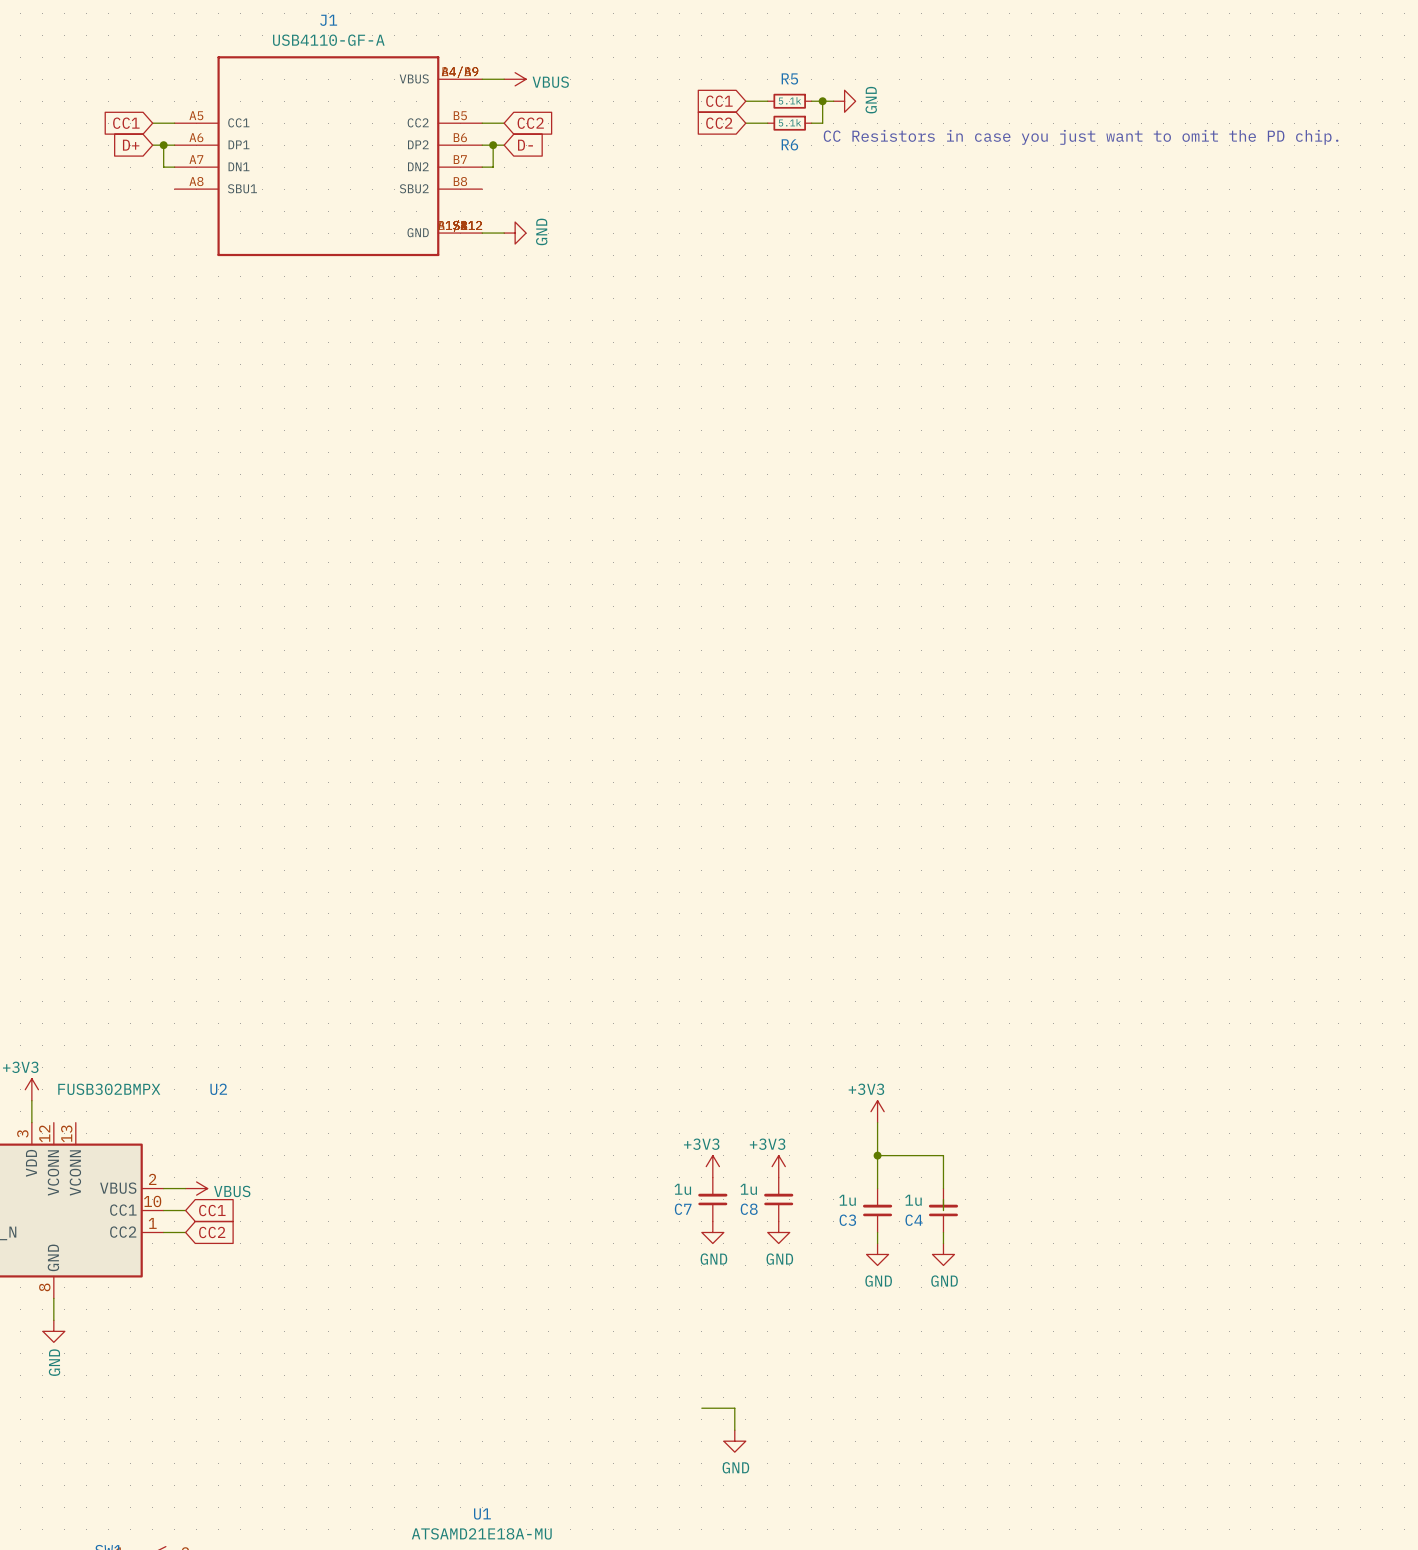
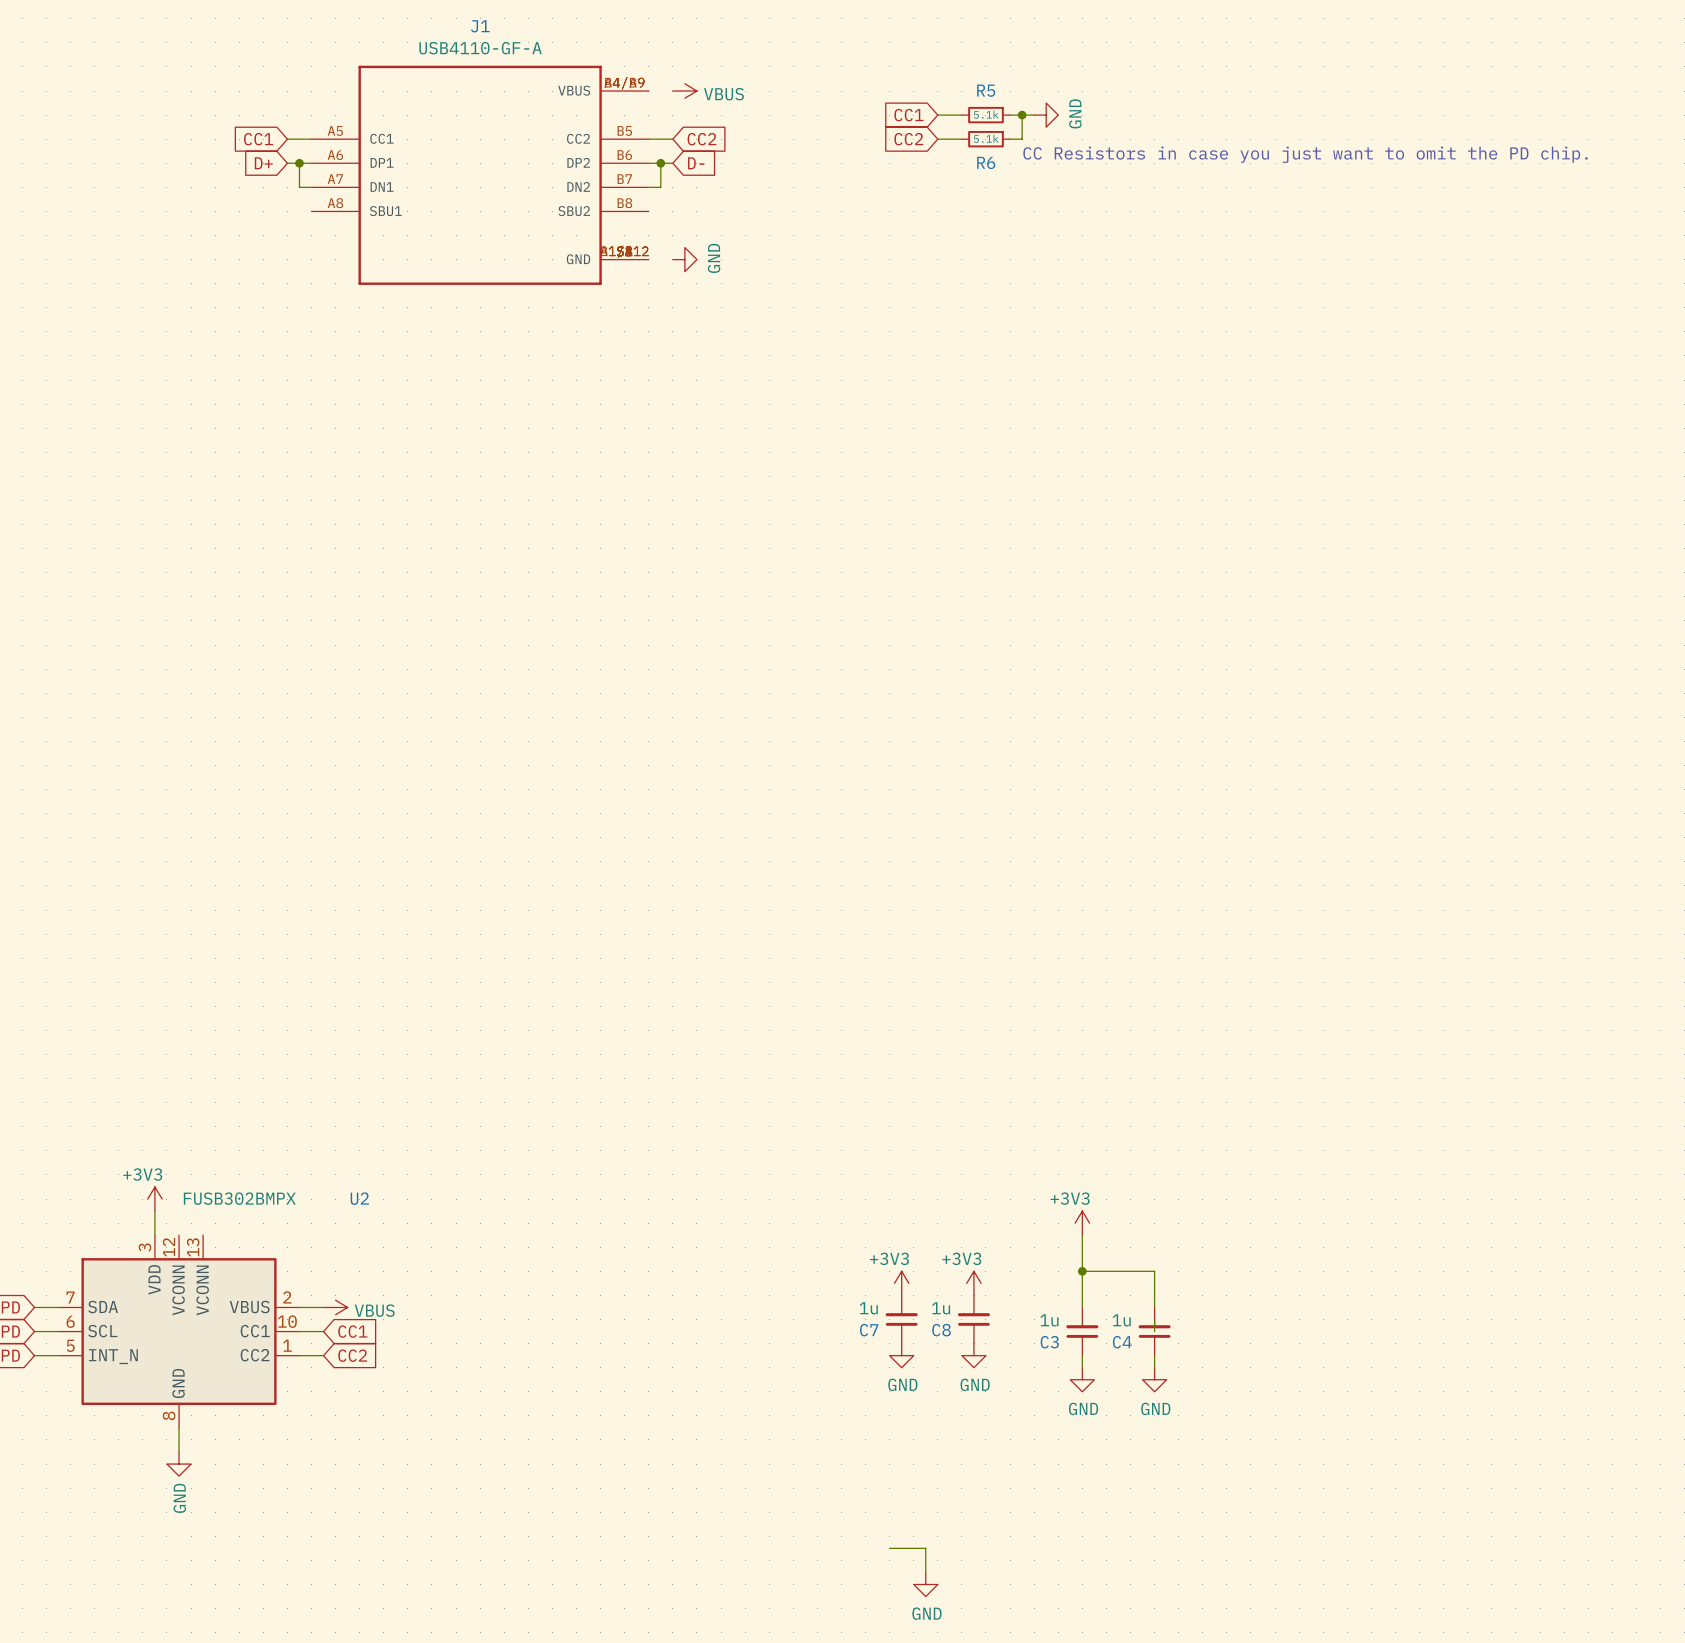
wire: (482, 79) (504, 79) -> none
wire: (482, 233) (504, 233) -> none

